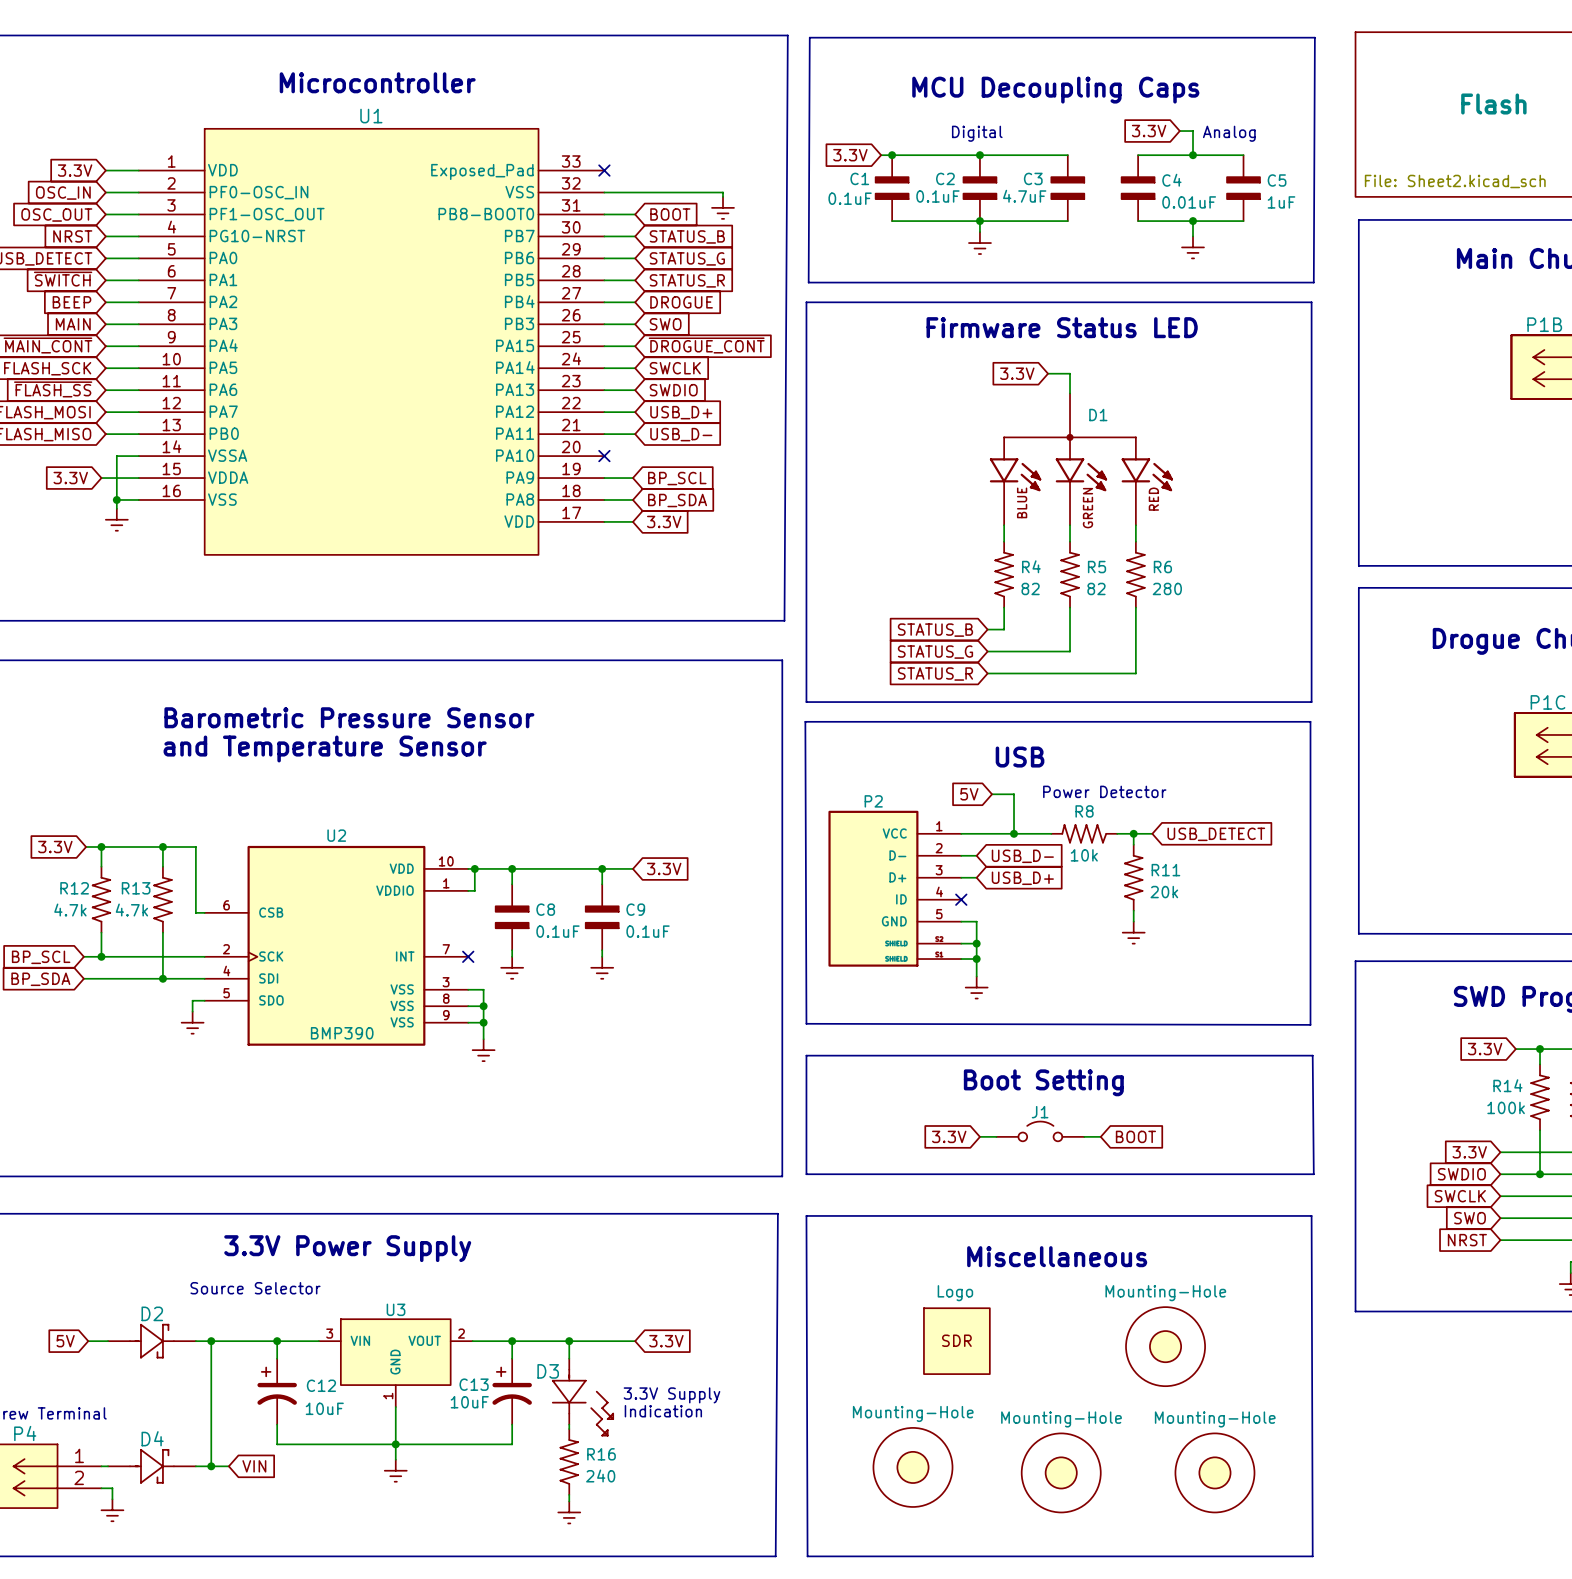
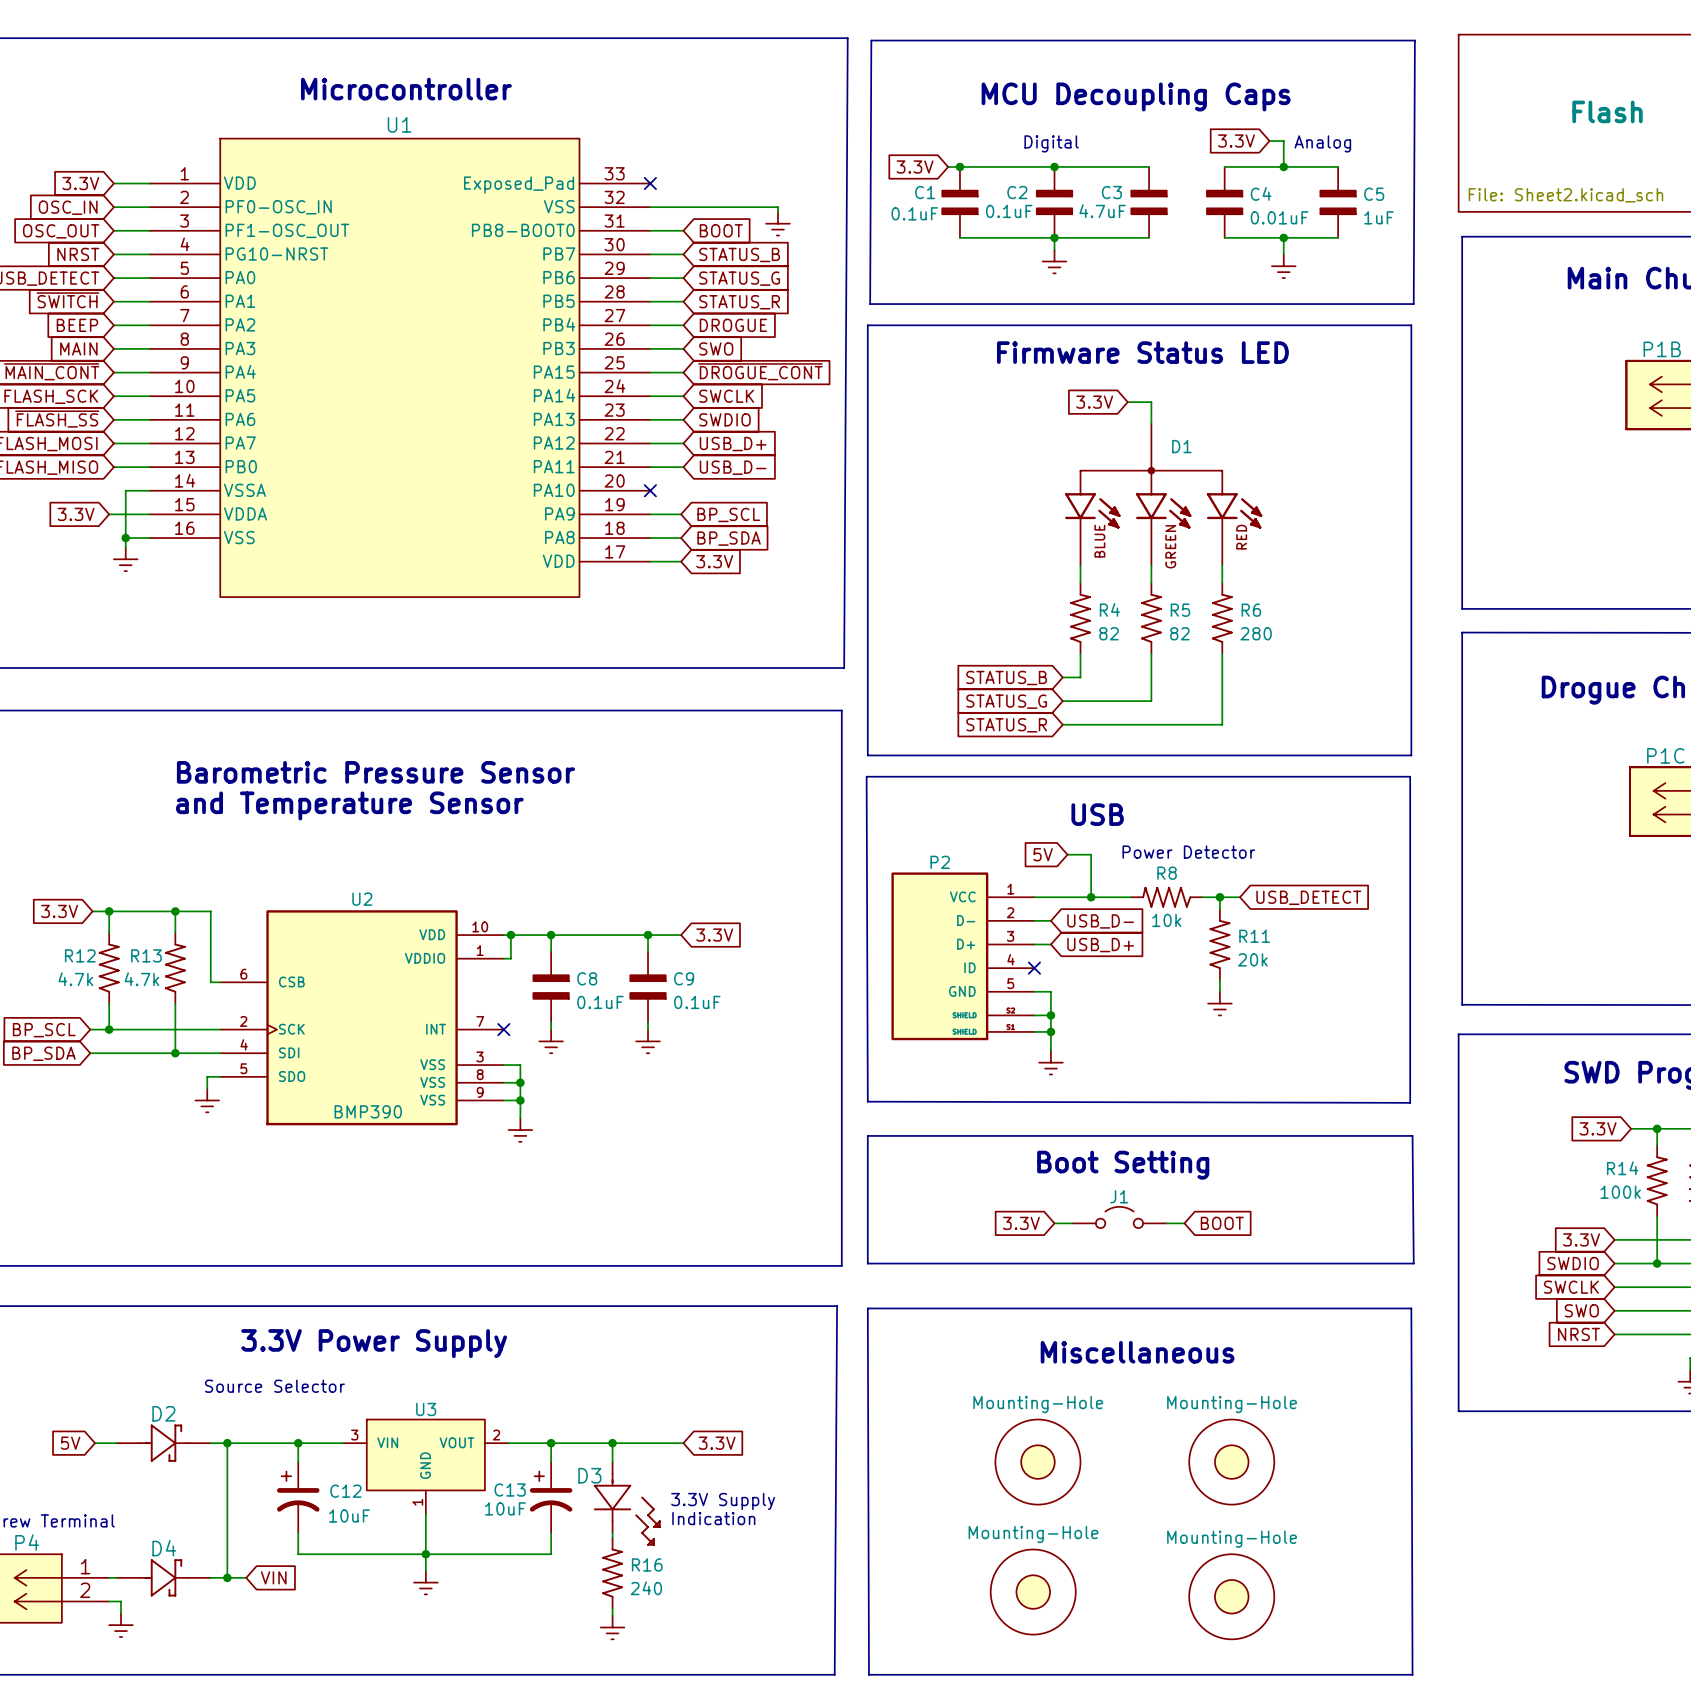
part: Logo (956, 1341) -> none
part position: (1165, 1346) -> (1231, 1462)
part: none -> Mounting-Hole (1037, 1462)
part position: (912, 1467) -> (1033, 1592)
part: Mounting-Hole (1061, 1472) -> none
part: Mounting-Hole (1214, 1472) -> none
part: none -> Mounting-Hole (1231, 1596)

